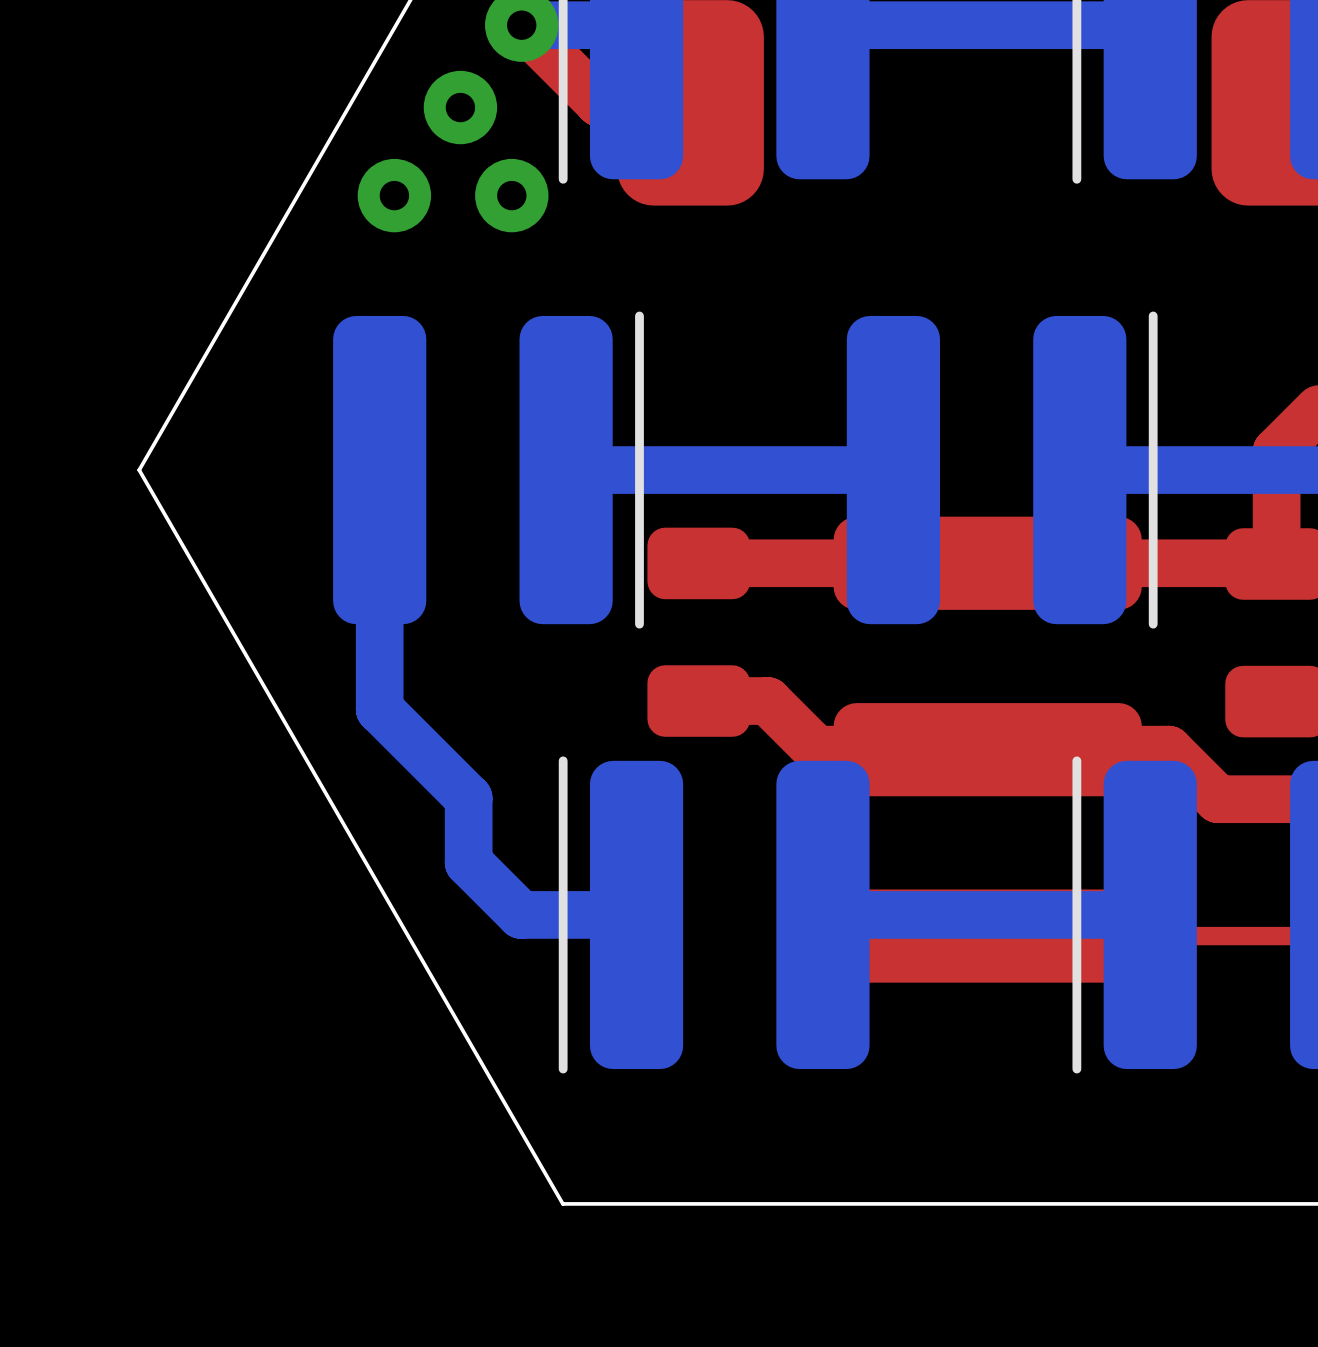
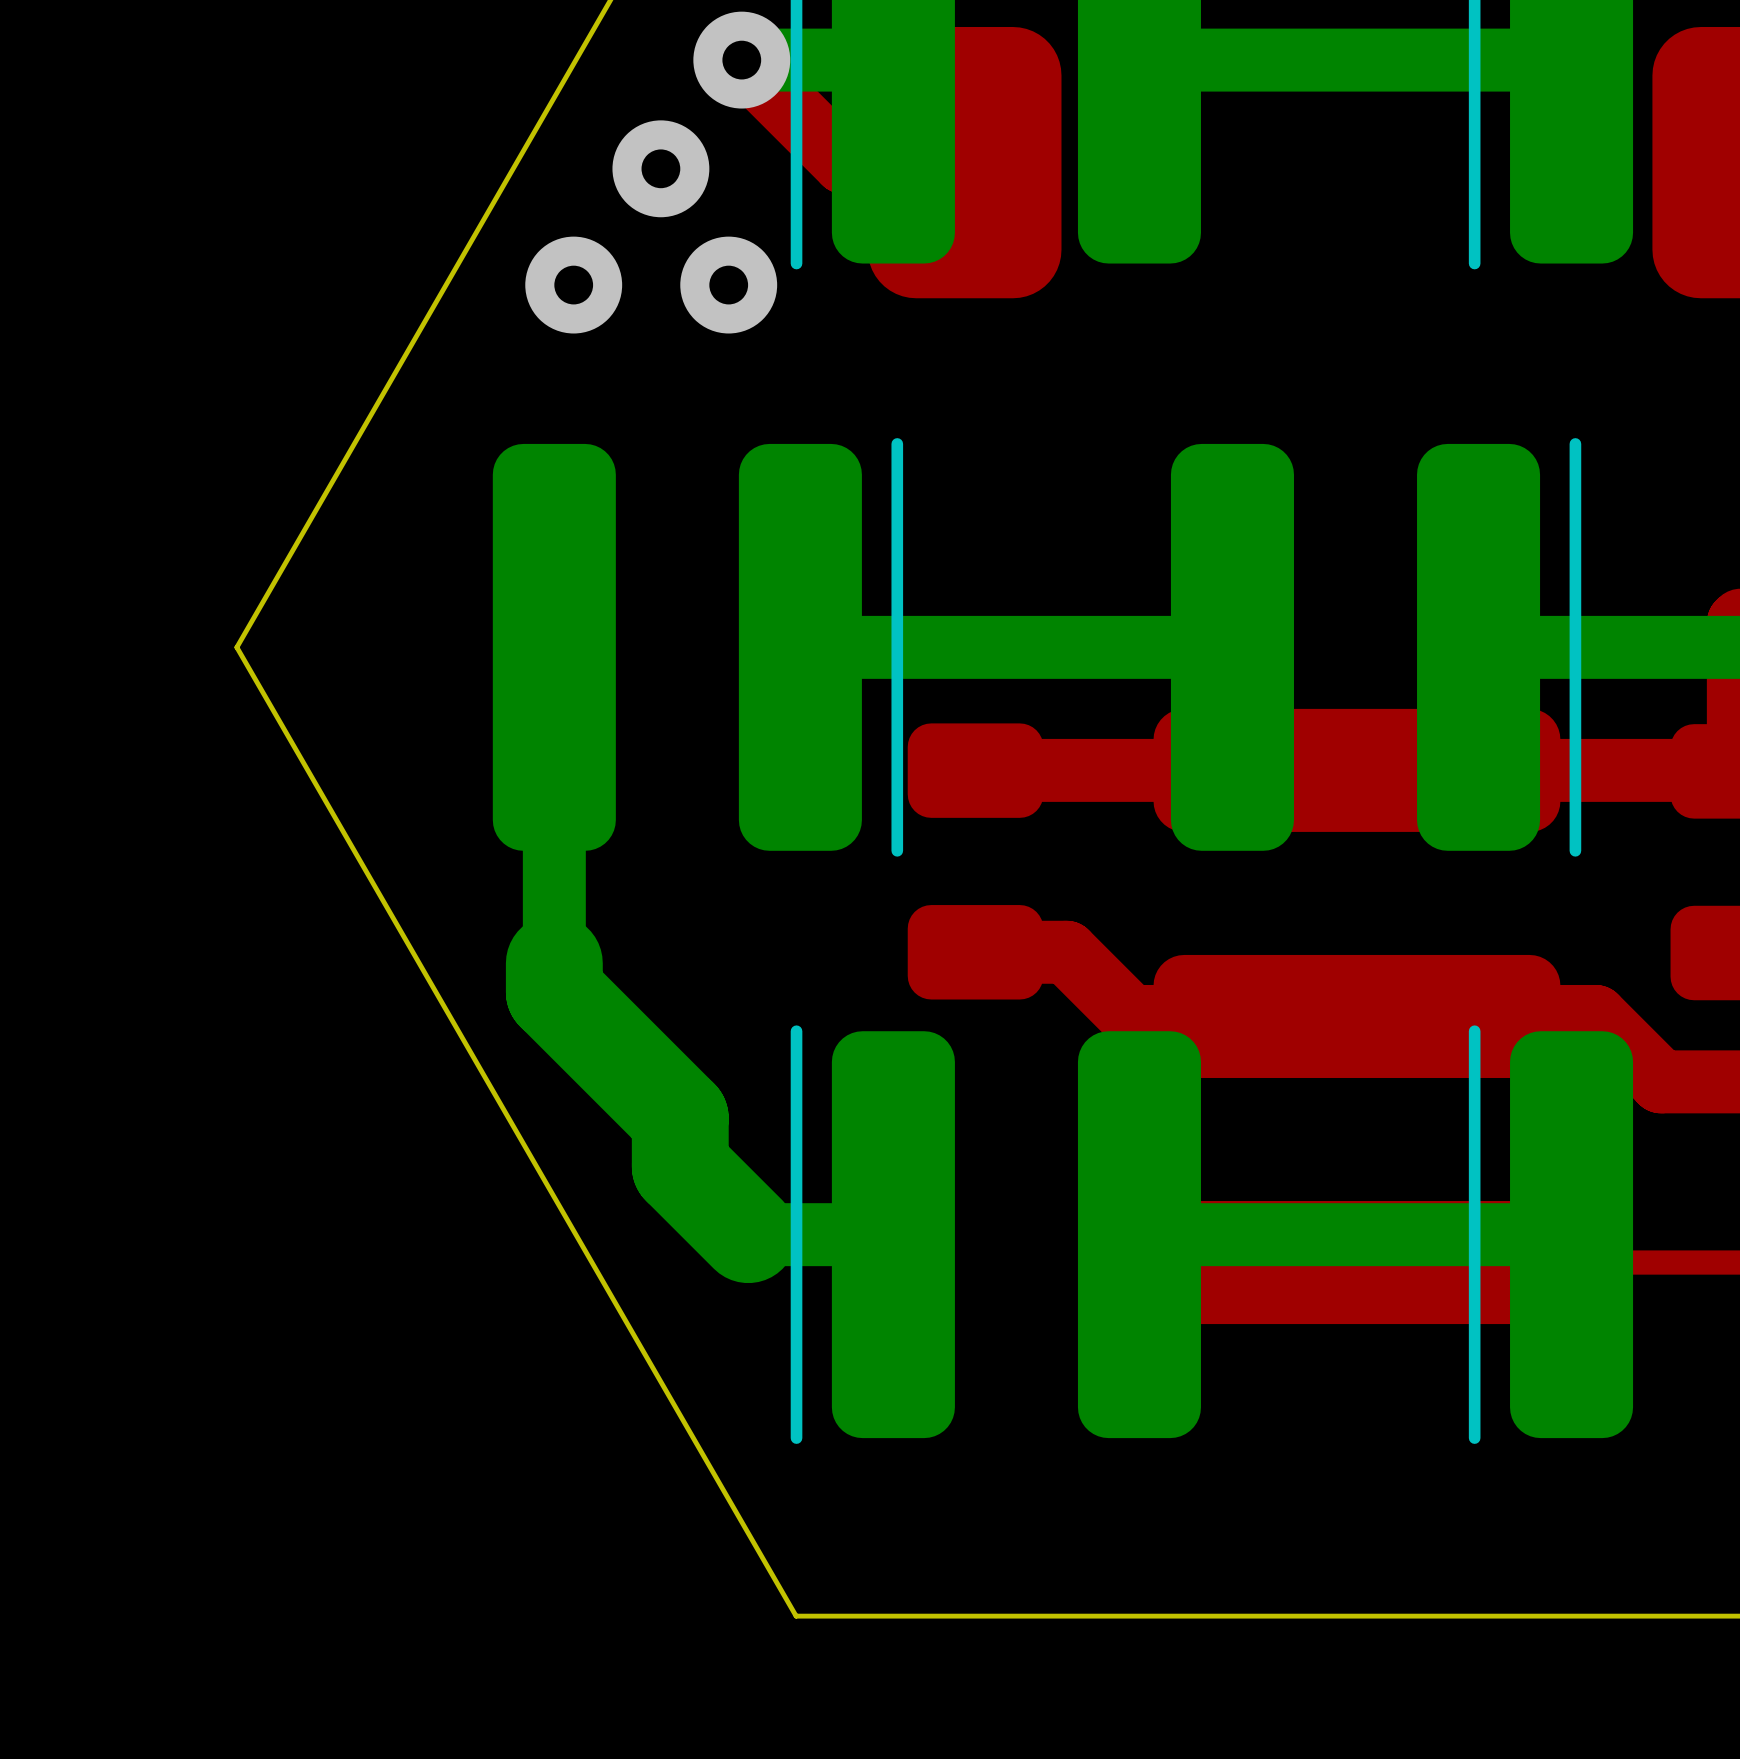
bottom track: (379, 709) (468, 798) (468, 862) (521, 914) -> (554, 963) (554, 992) (680, 1118) (680, 1166) (748, 1234)

